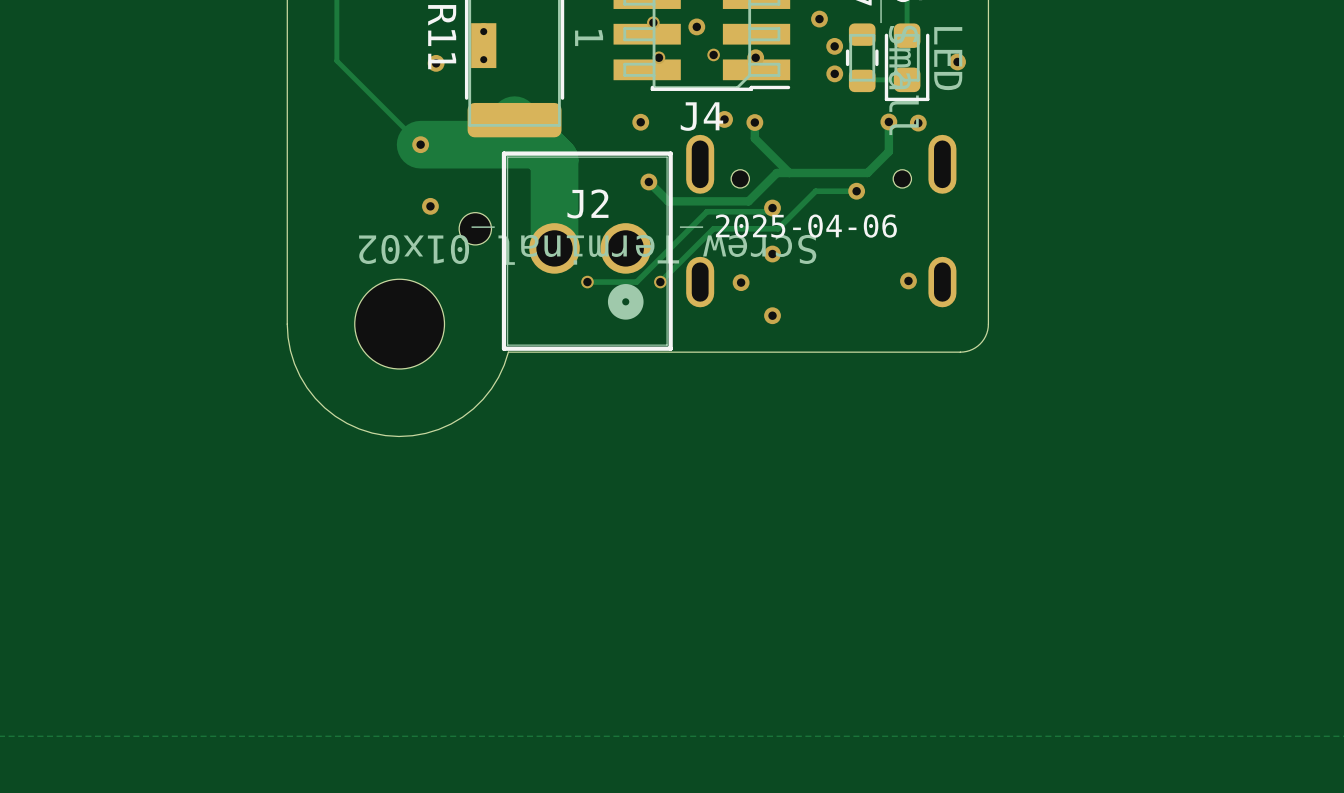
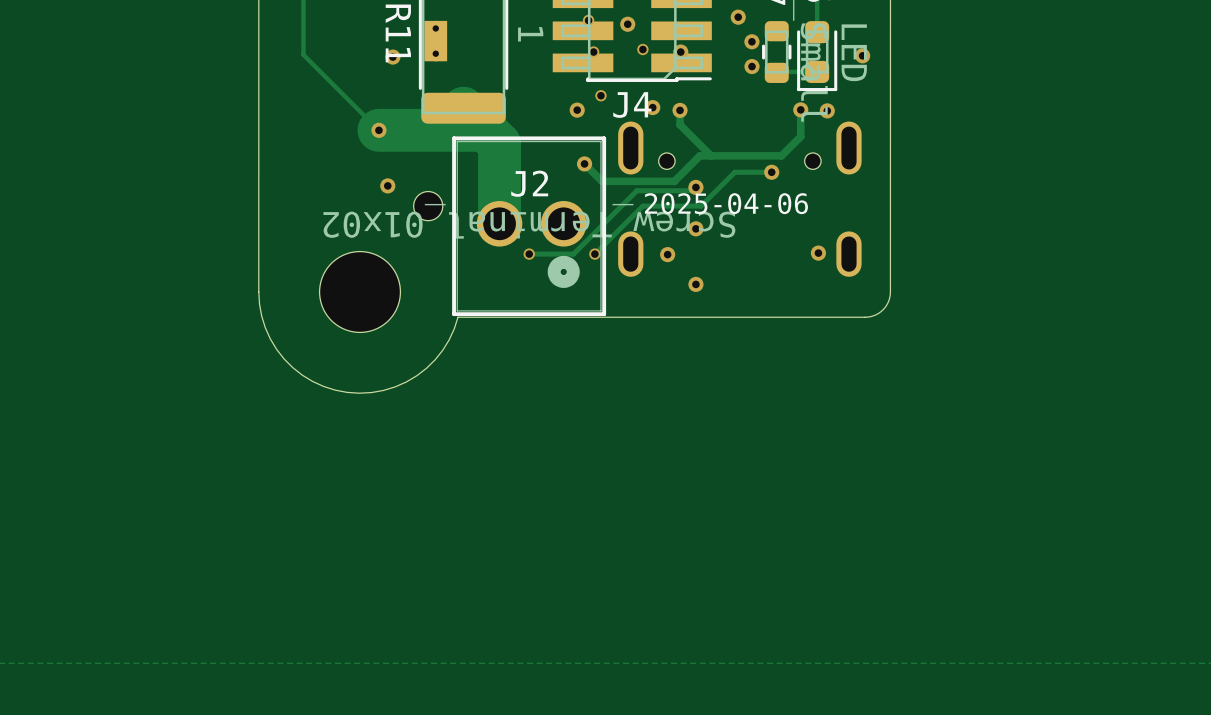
via: none -> (600, 95)

